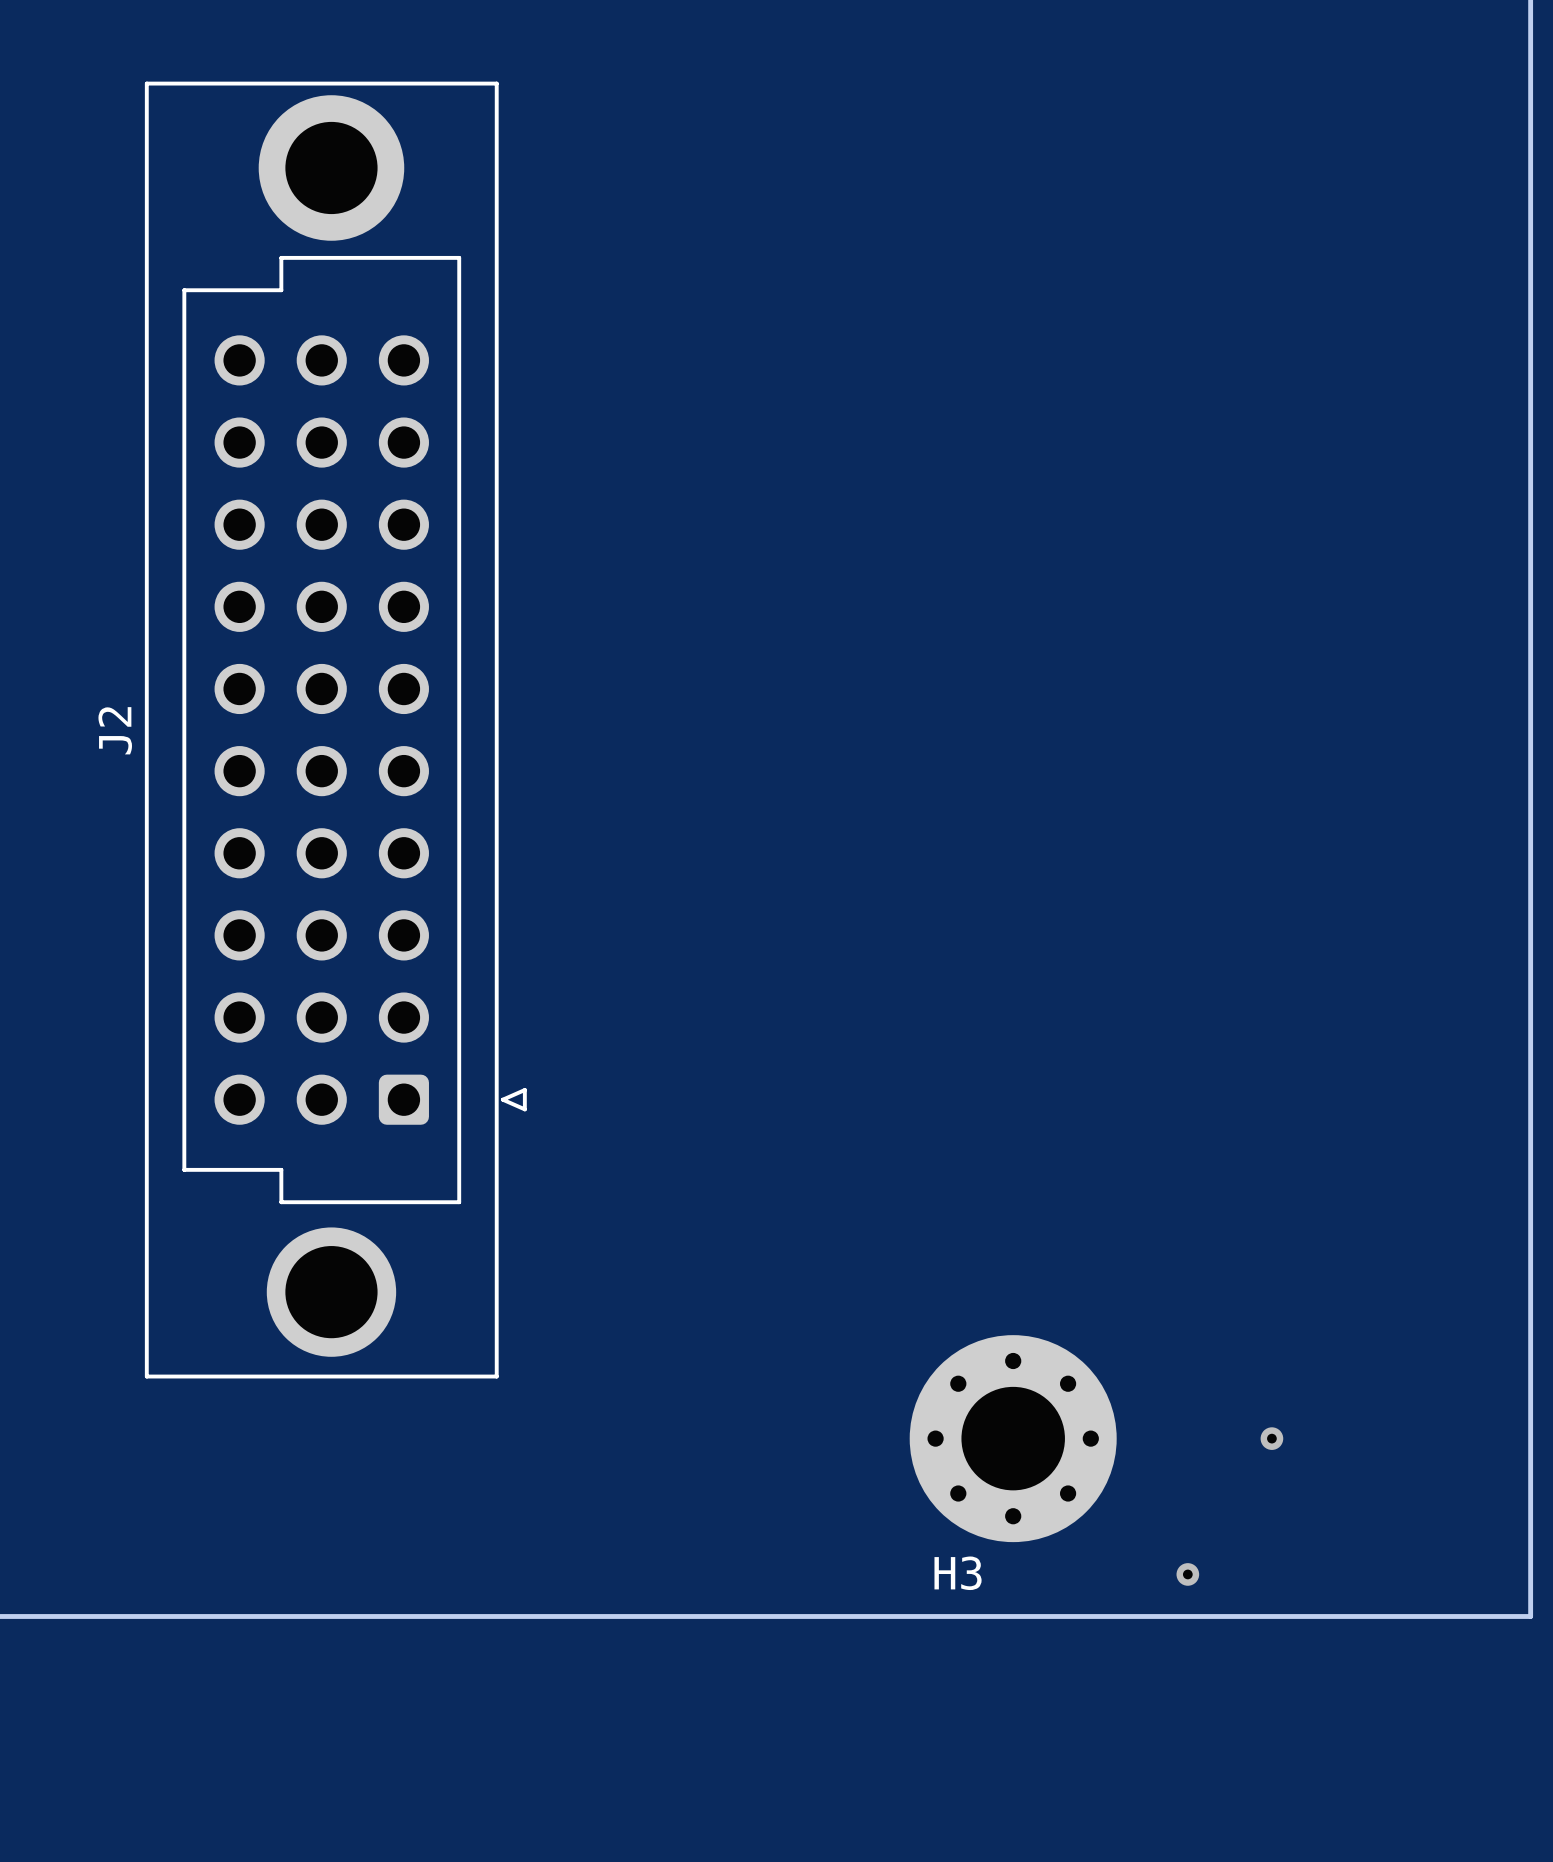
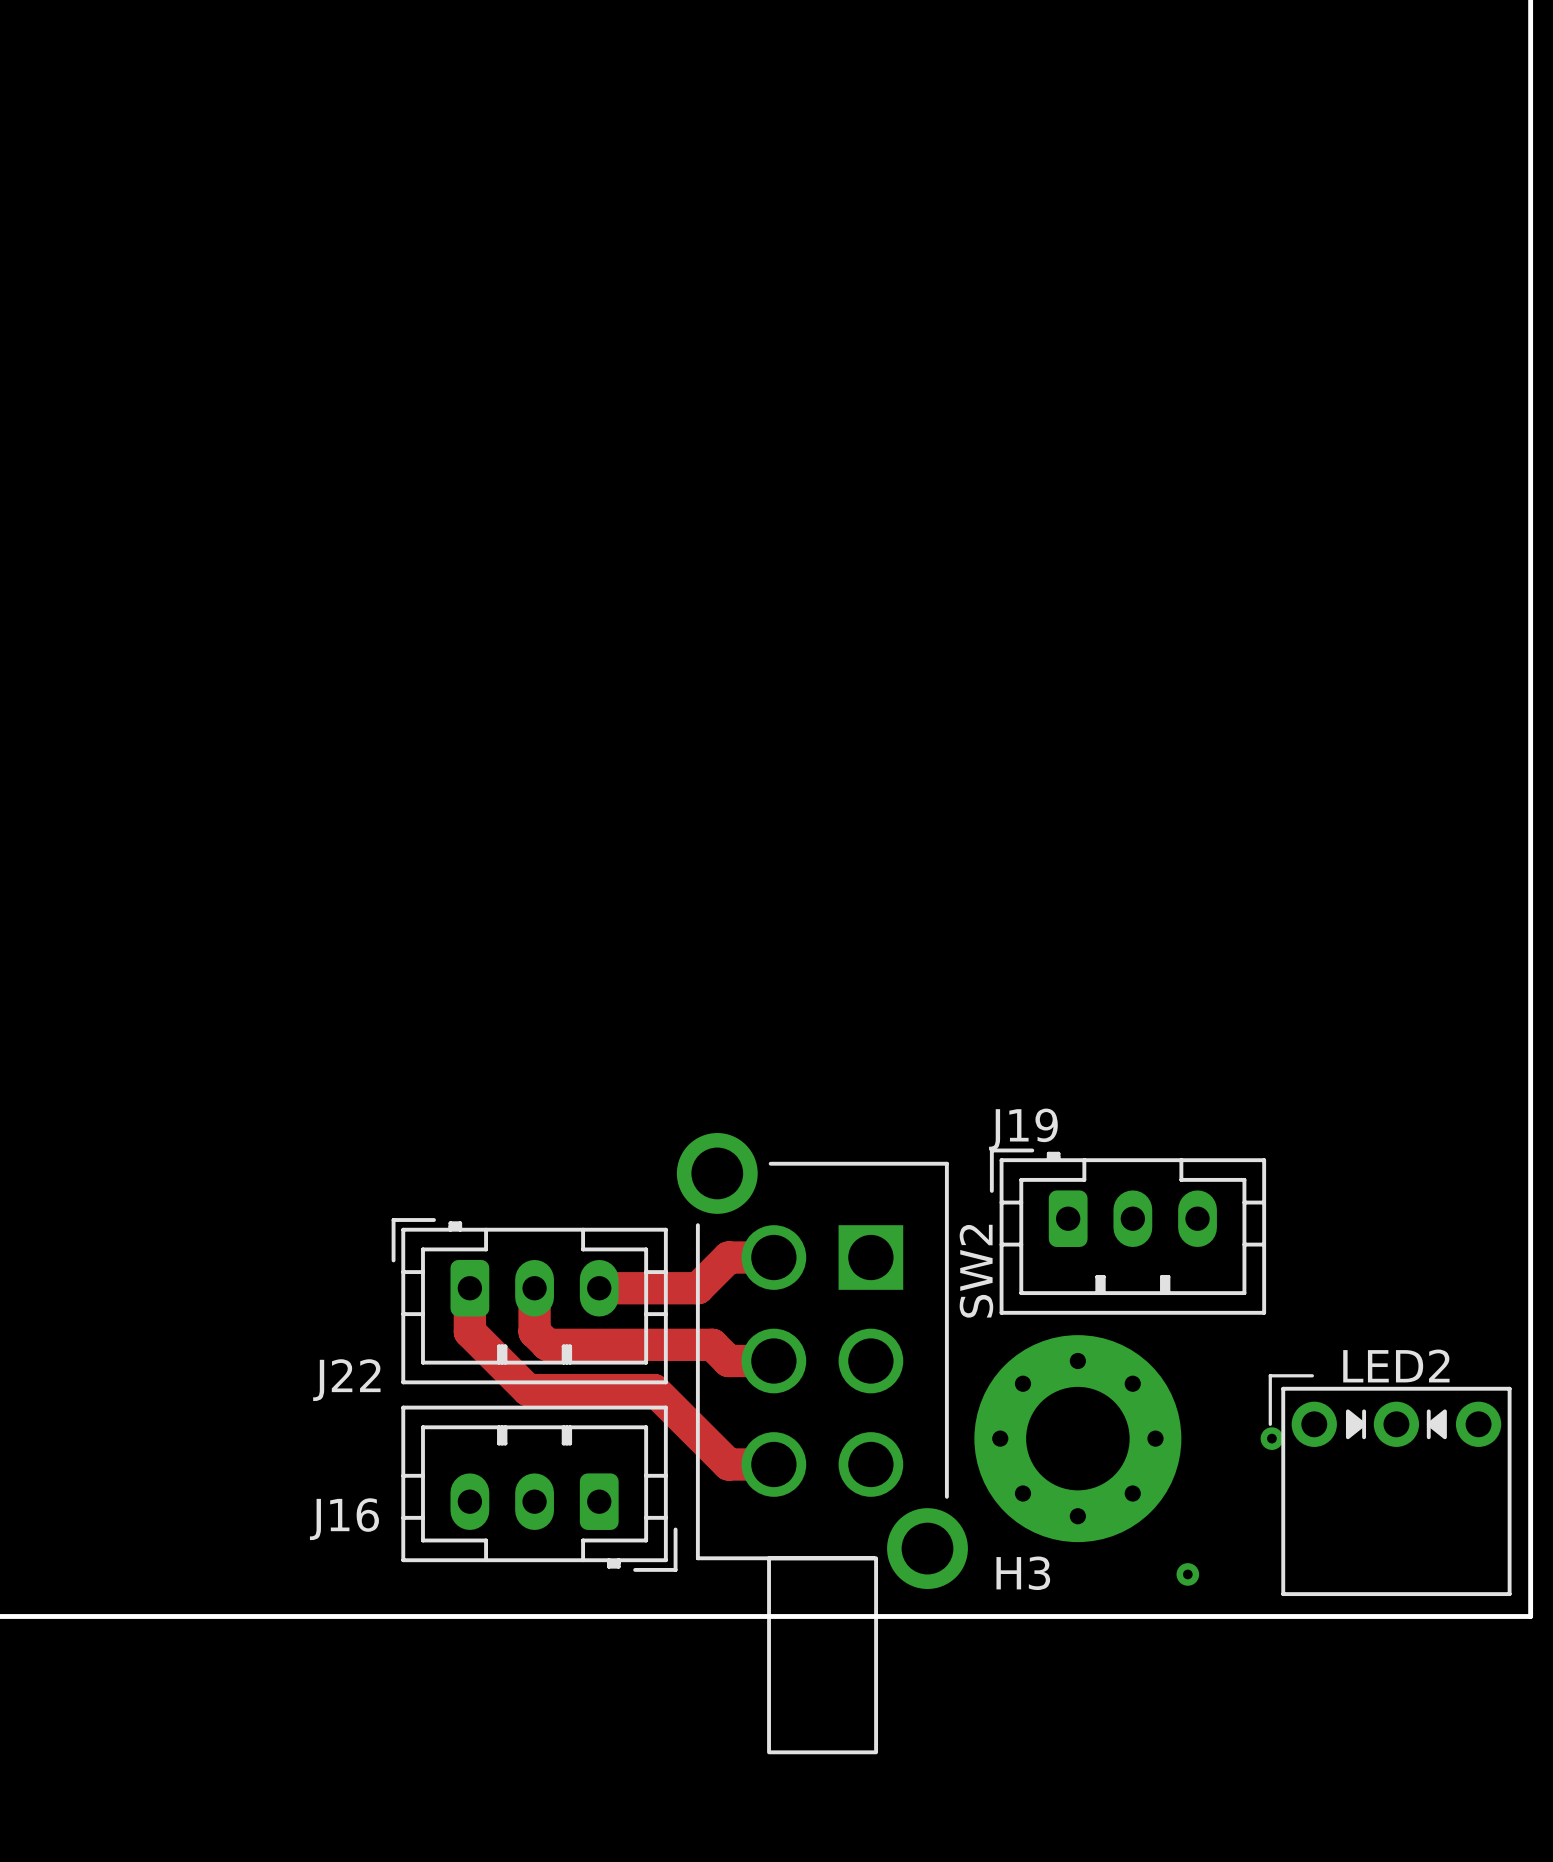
J2: (335, 730) -> none
J19: none -> (1128, 1231)
track: none -> (773, 1257) (728, 1257) (697, 1288) (599, 1288)
track: none -> (469, 1288) (469, 1331) (528, 1390) (654, 1390) (728, 1464) (773, 1464)
track: none -> (534, 1288) (534, 1331) (547, 1344) (712, 1344) (728, 1361) (773, 1361)
J22: none -> (529, 1301)
H3 position: (1013, 1438) -> (1077, 1438)
SW2: none -> (822, 1443)
LED2: none -> (1390, 1485)
J16: none -> (539, 1488)

